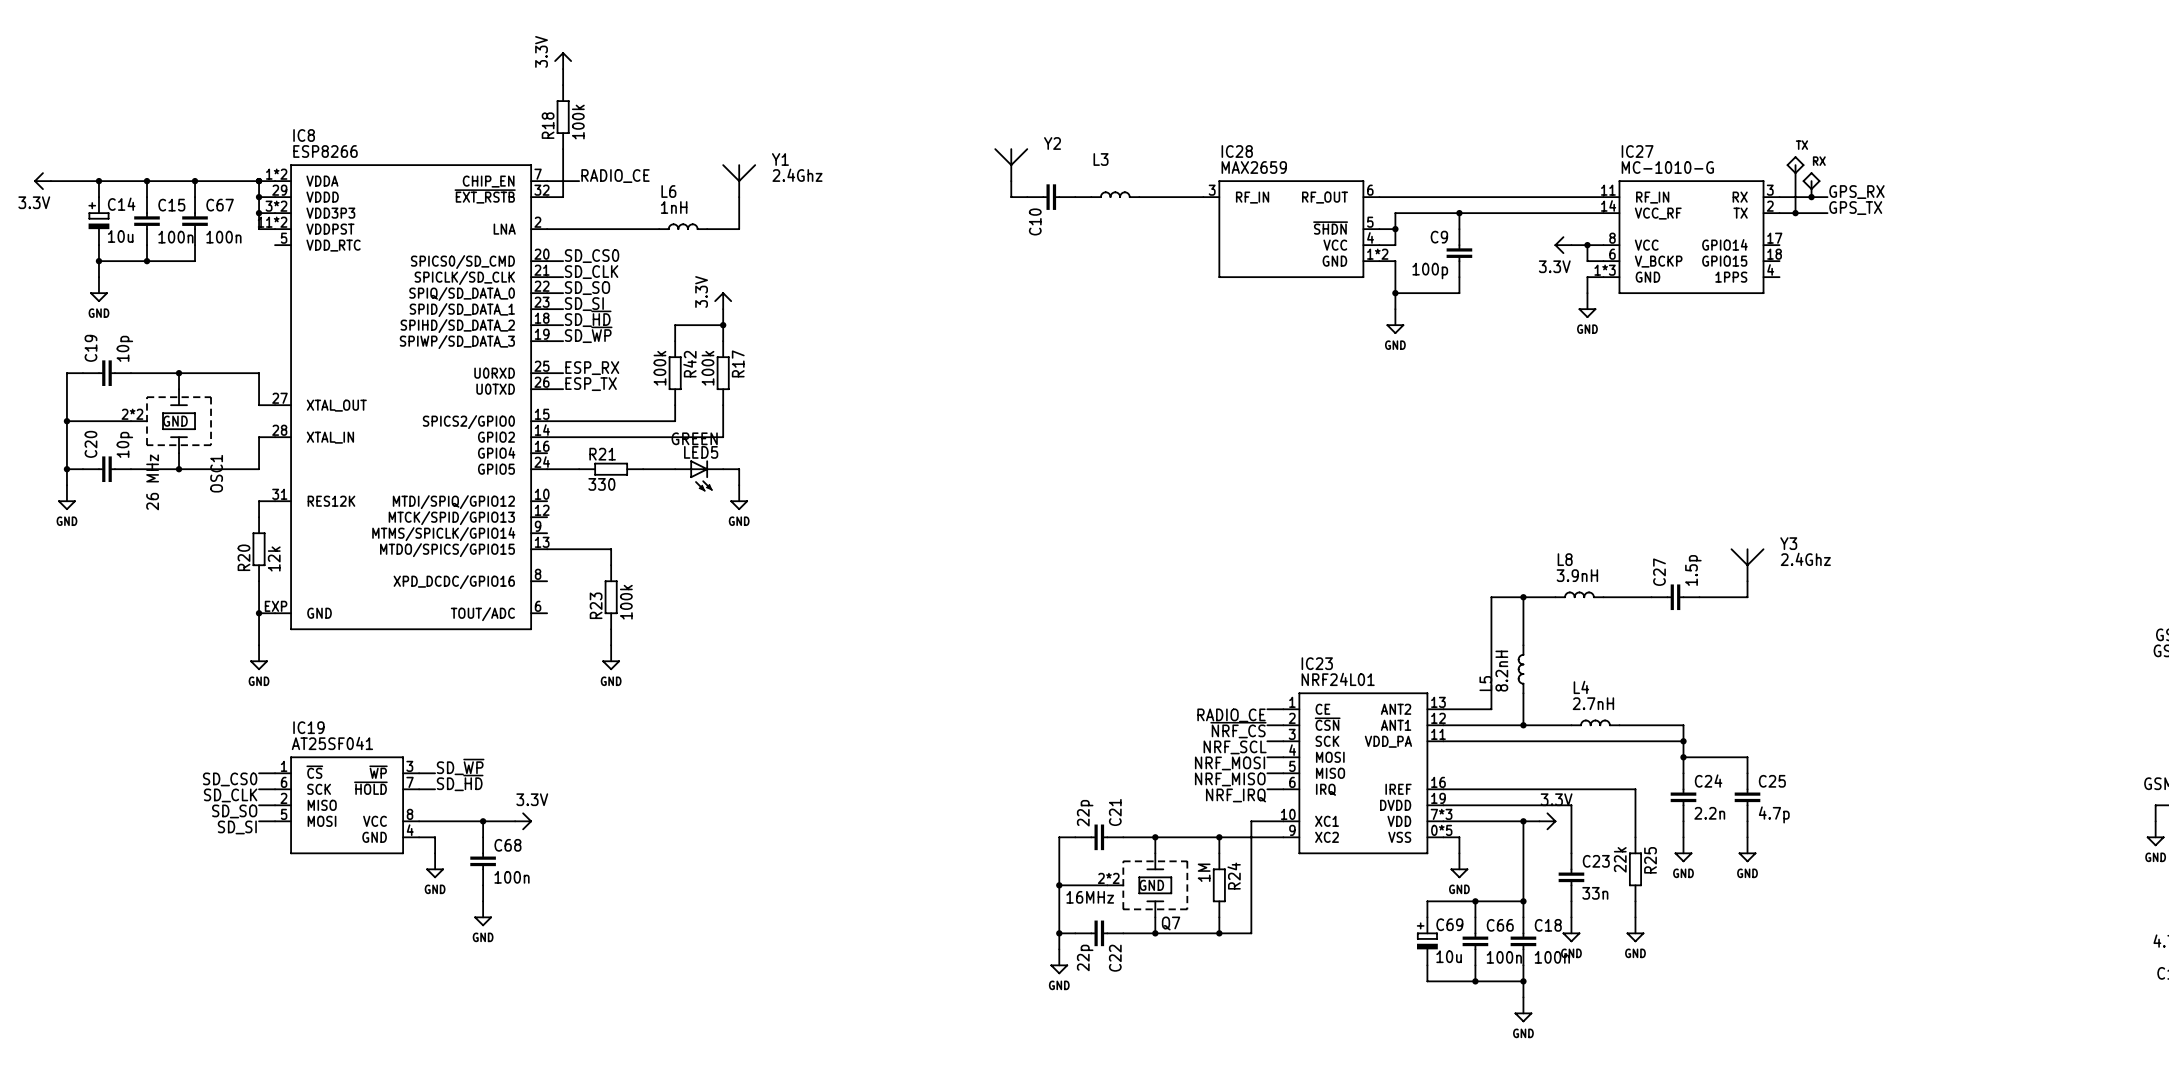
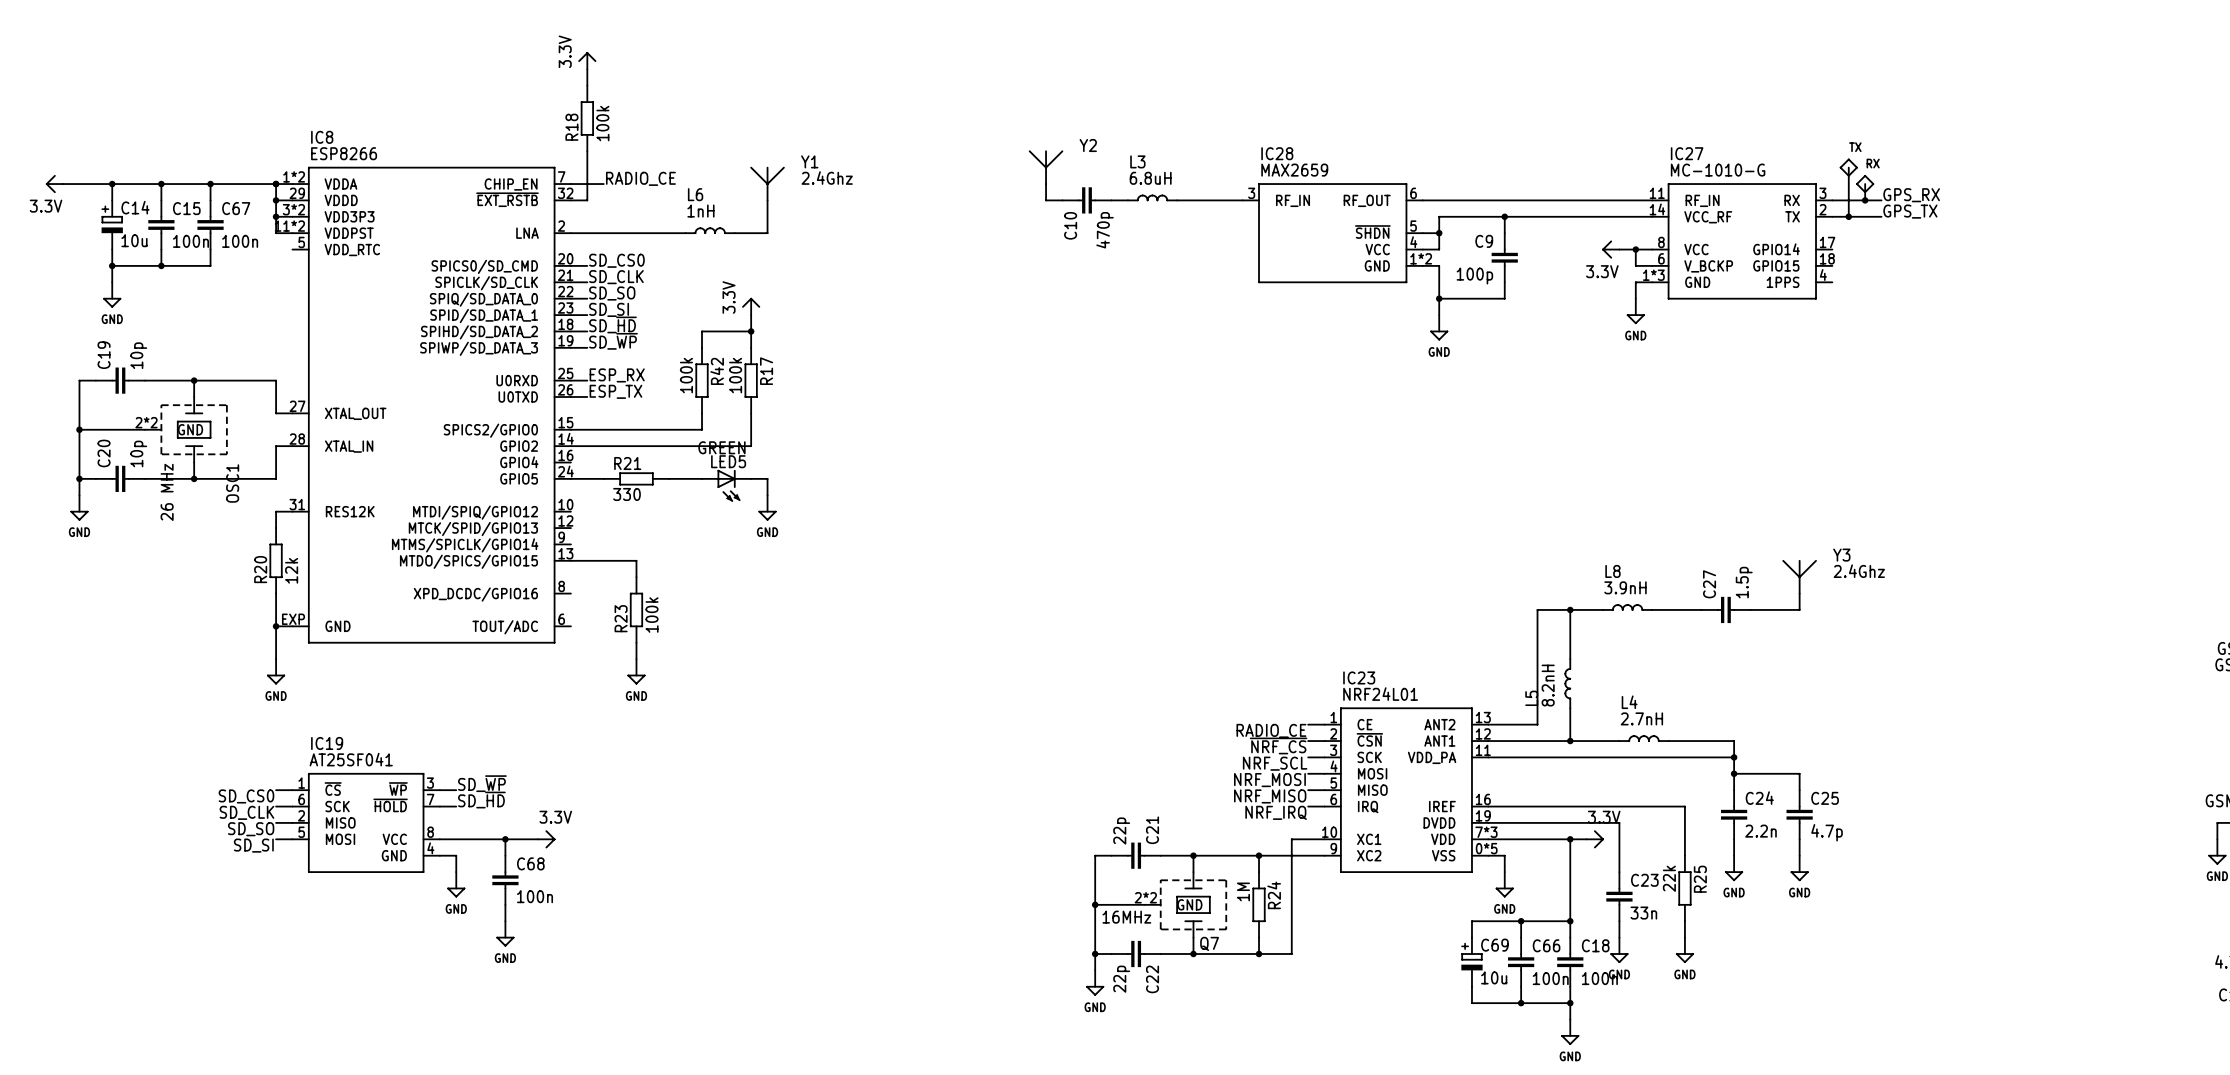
L3 value: none -> 6.8uH (1150, 178)
C10 value: none -> 470p (1105, 230)

